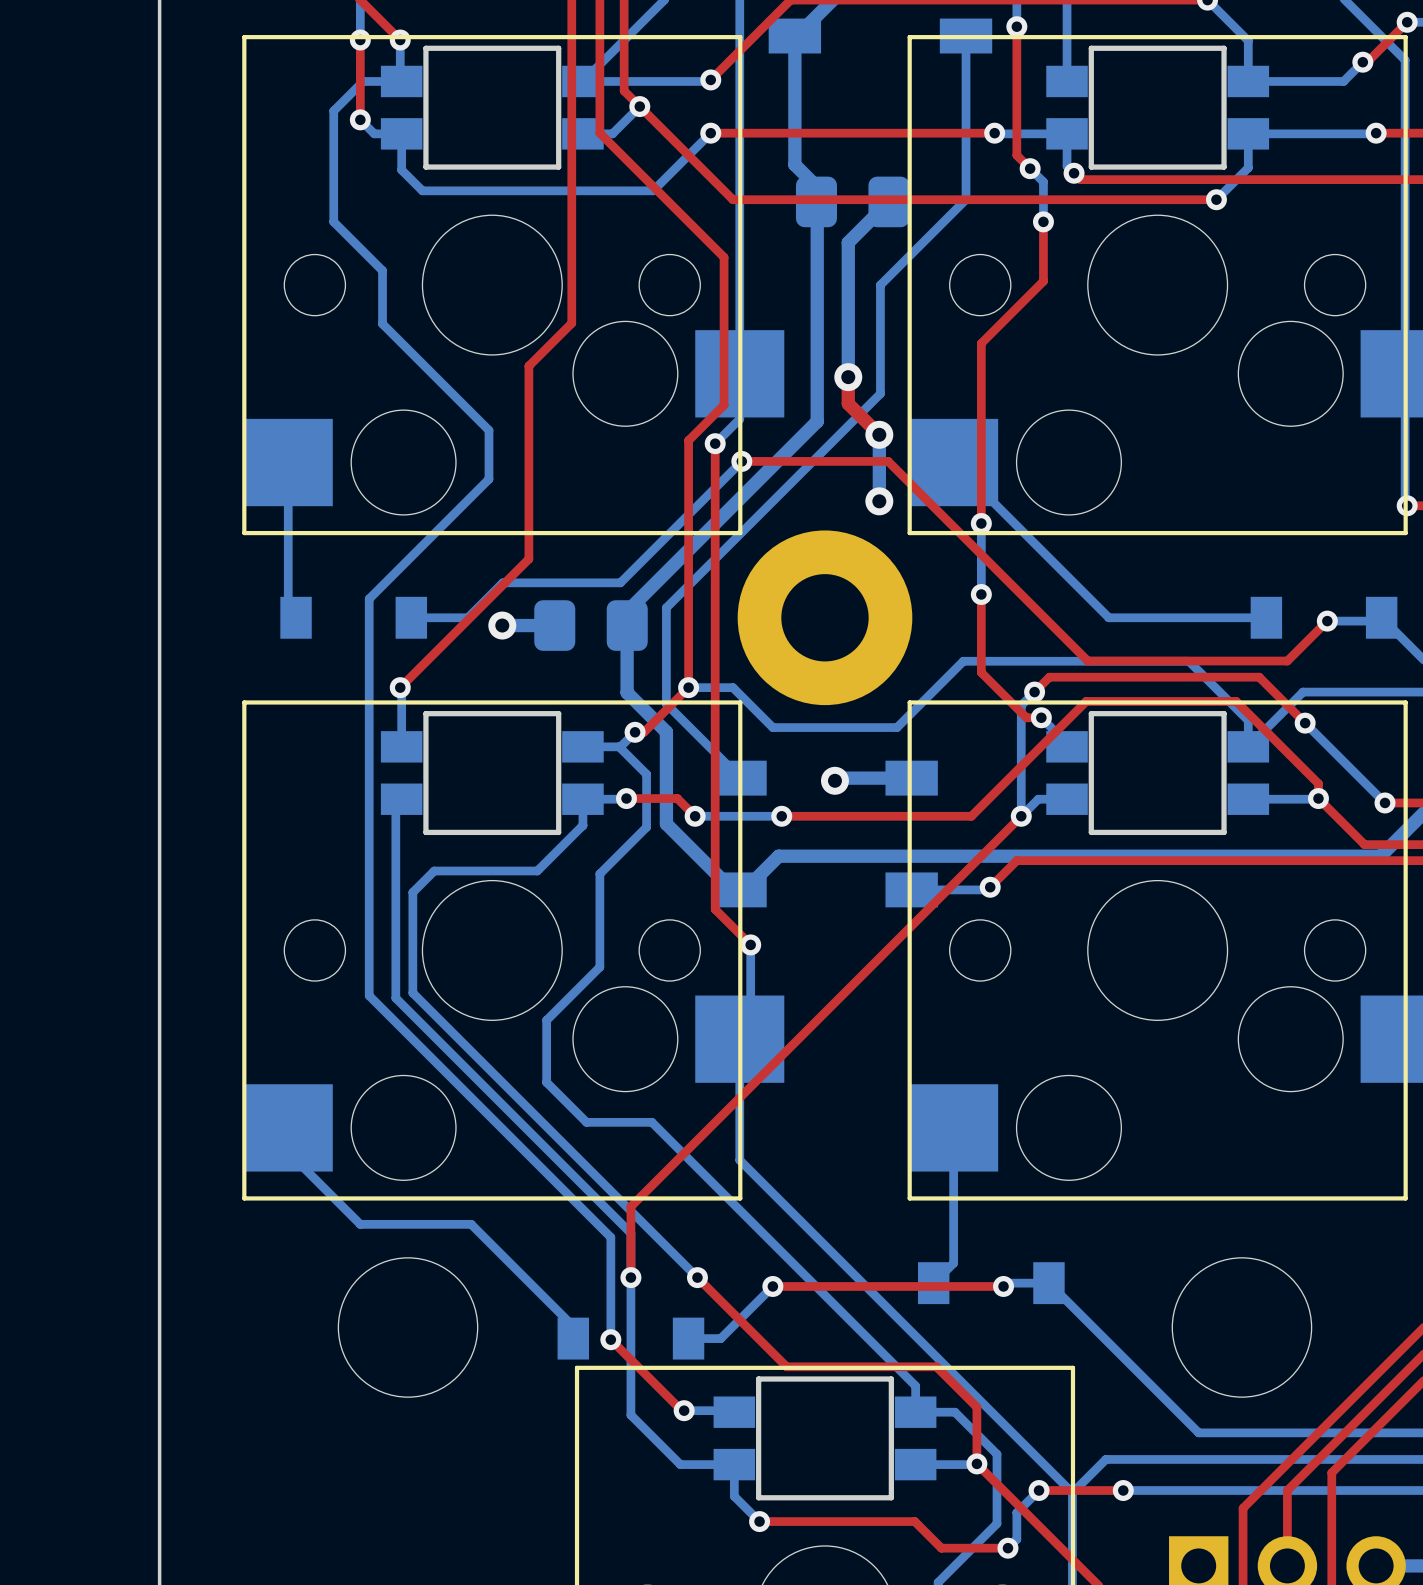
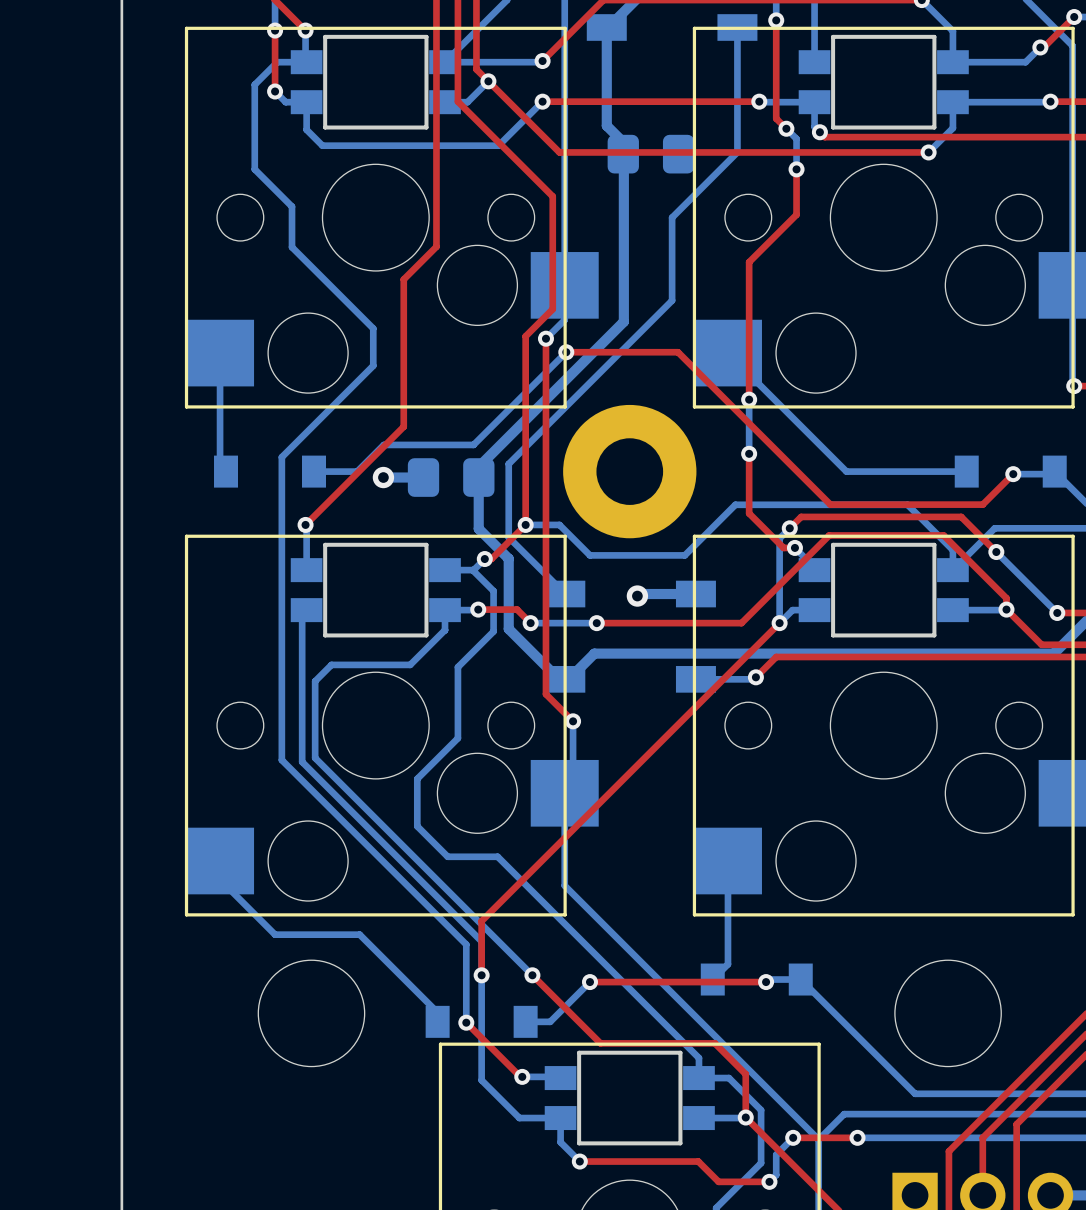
bottom track: (888, 201) (848, 242) (848, 377) -> none
top track: (848, 377) (848, 403) (879, 434) -> none
via: (848, 377) -> none
bottom track: (879, 434) (879, 501) -> none
via: (879, 434) -> none
via: (879, 501) -> none

